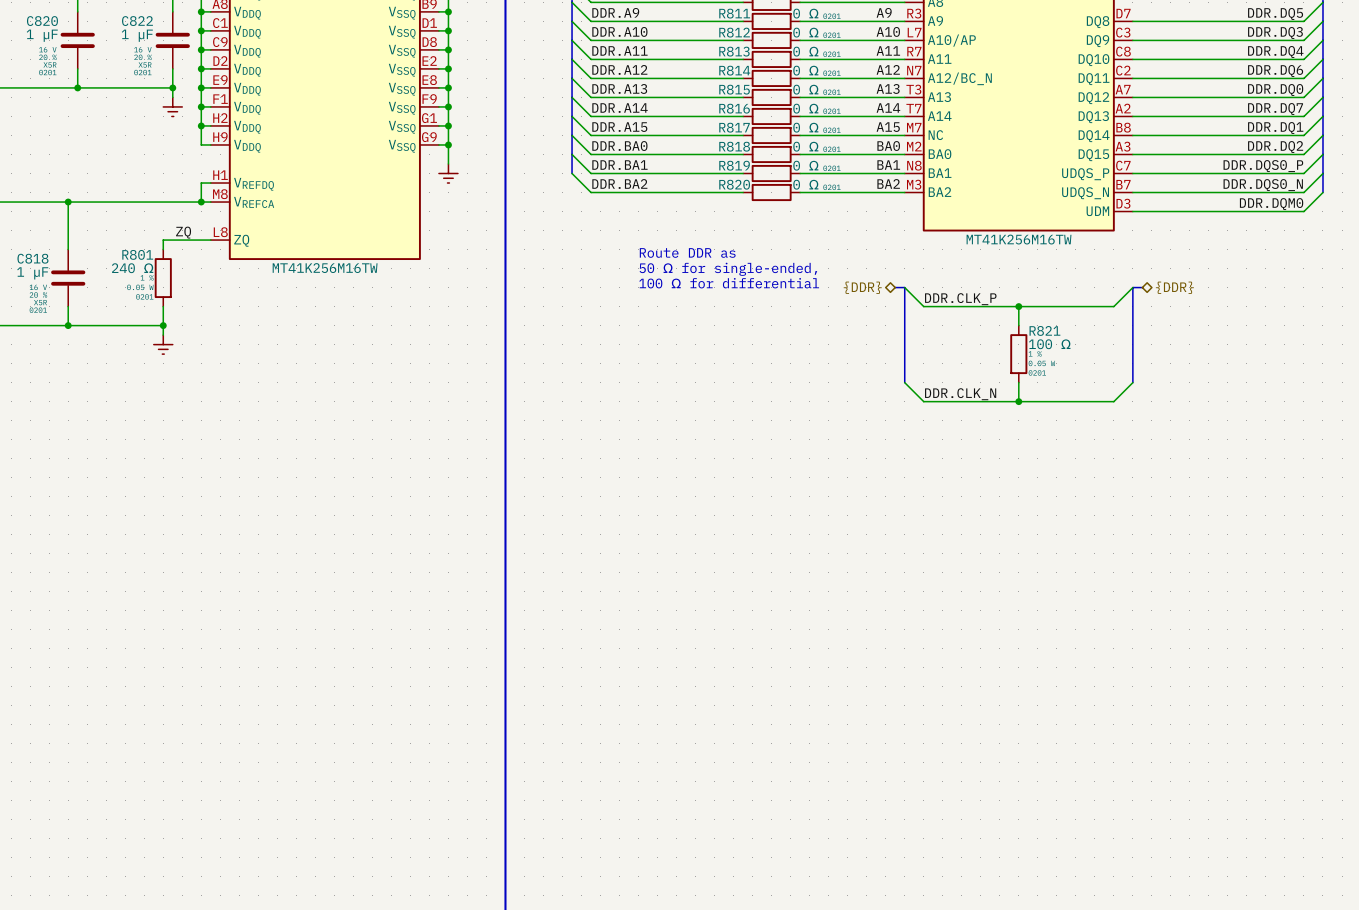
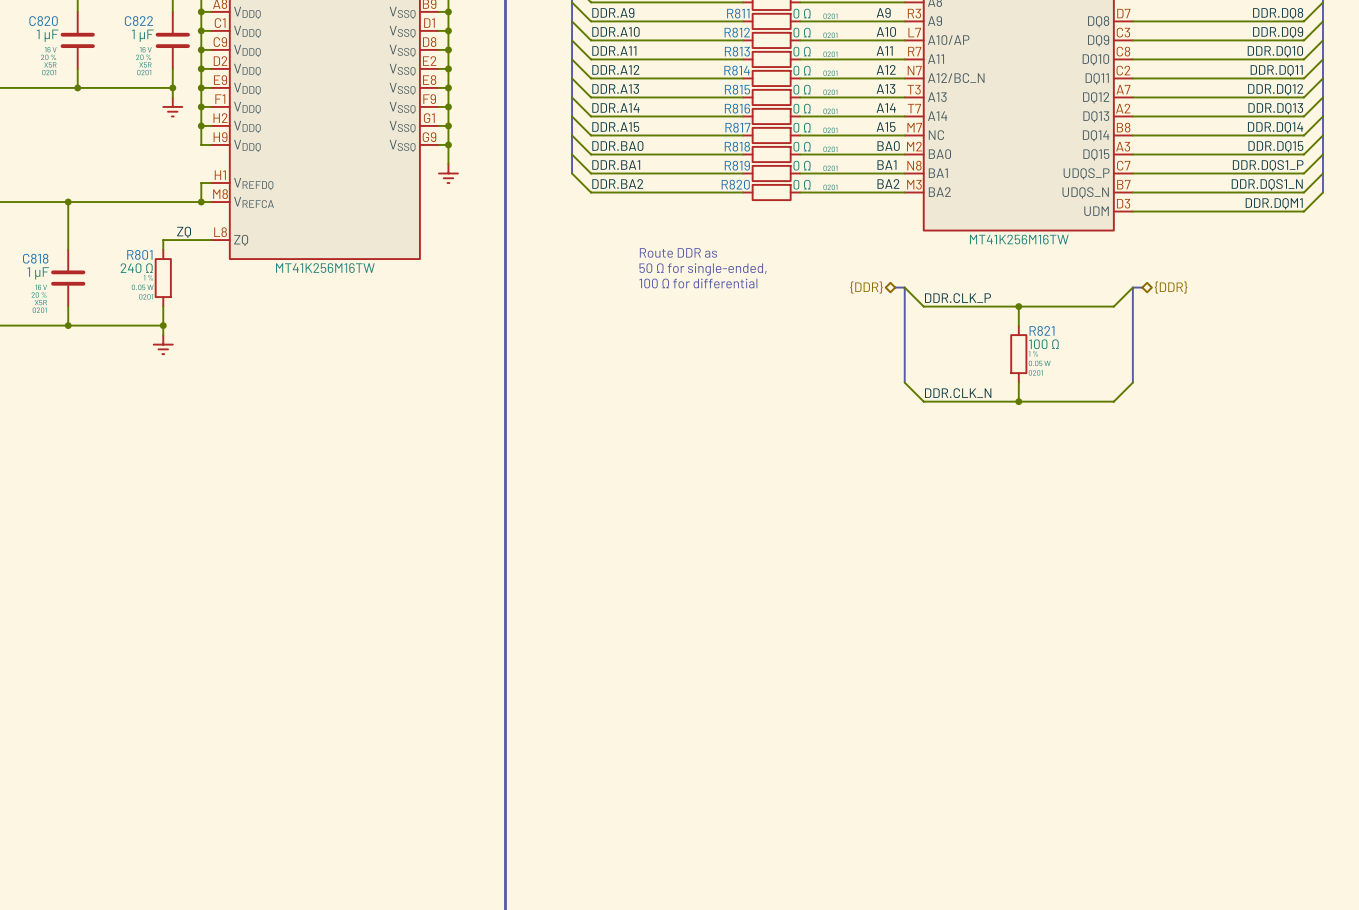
label: DDR.DQ5 (1275, 13) -> DDR.DQ8 (1278, 13)
label: DDR.DQ3 (1275, 32) -> DDR.DQ9 (1278, 32)
label: DDR.DQ4 (1275, 51) -> DDR.DQ10 (1275, 51)
label: DDR.DQ6 (1275, 70) -> DDR.DQ11 (1276, 70)
label: DDR.DQ0 (1275, 90) -> DDR.DQ12 (1275, 89)
label: DDR.DQ7 (1275, 109) -> DDR.DQ13 (1275, 108)
label: DDR.DQ1 (1275, 128) -> DDR.DQ14 (1275, 127)
label: DDR.DQ2 (1275, 147) -> DDR.DQ15 (1275, 146)
label: DDR.DQS0_P (1263, 166) -> DDR.DQS1_P (1268, 165)
label: DDR.DQS0_N (1263, 185) -> DDR.DQS1_N (1267, 184)
label: DDR.DQM0 (1271, 204) -> DDR.DQM1 (1274, 203)

